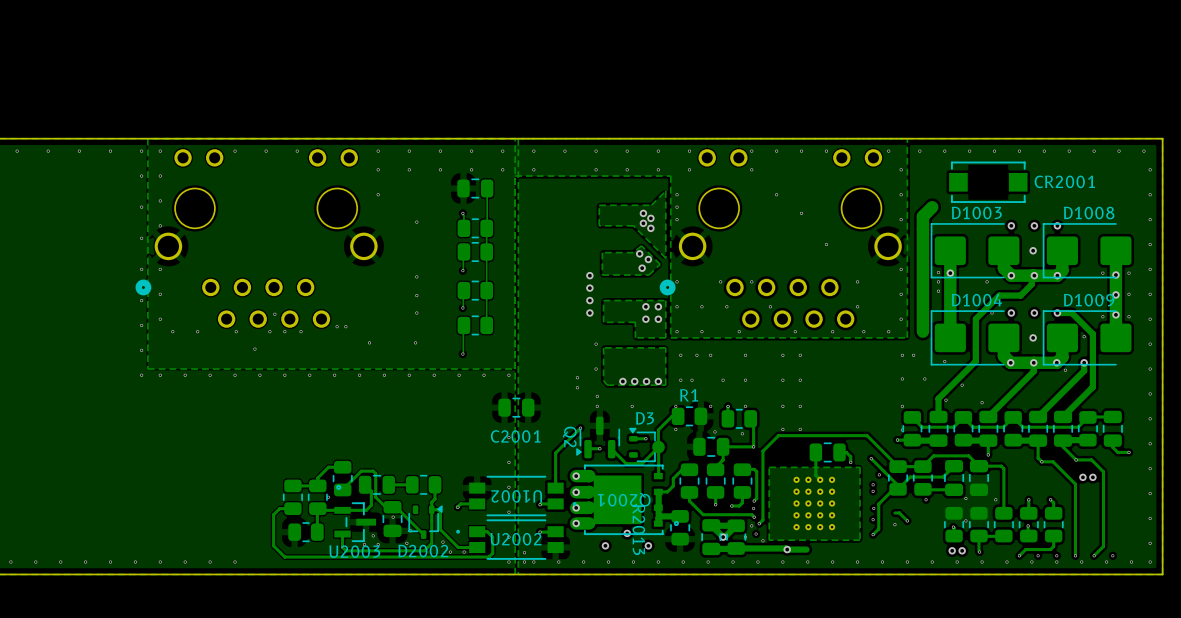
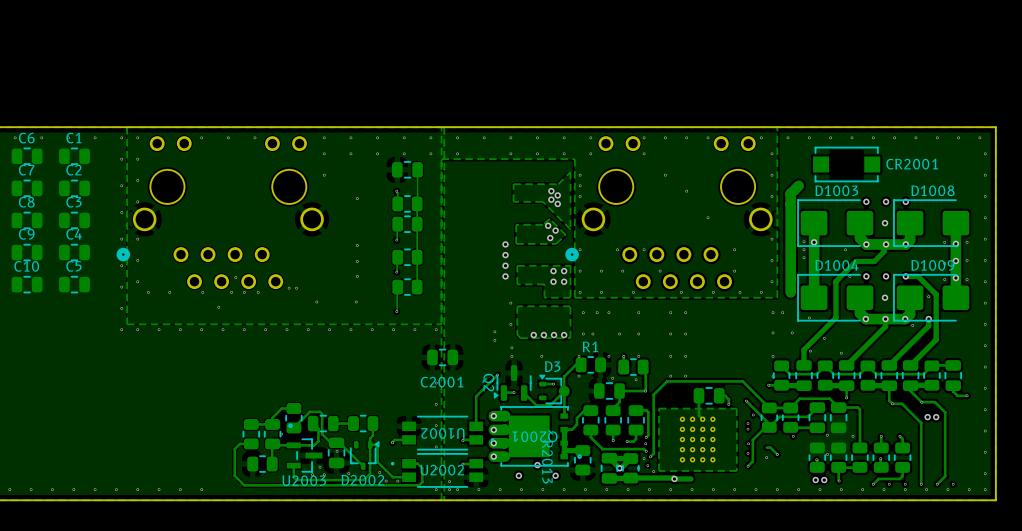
C6: none -> (27, 156)
C1: none -> (74, 156)
C7: none -> (27, 188)
C2: none -> (74, 188)
C8: none -> (27, 220)
C3: none -> (74, 220)
C9: none -> (27, 252)
C4: none -> (74, 252)
C10: none -> (27, 284)
C5: none -> (74, 284)

